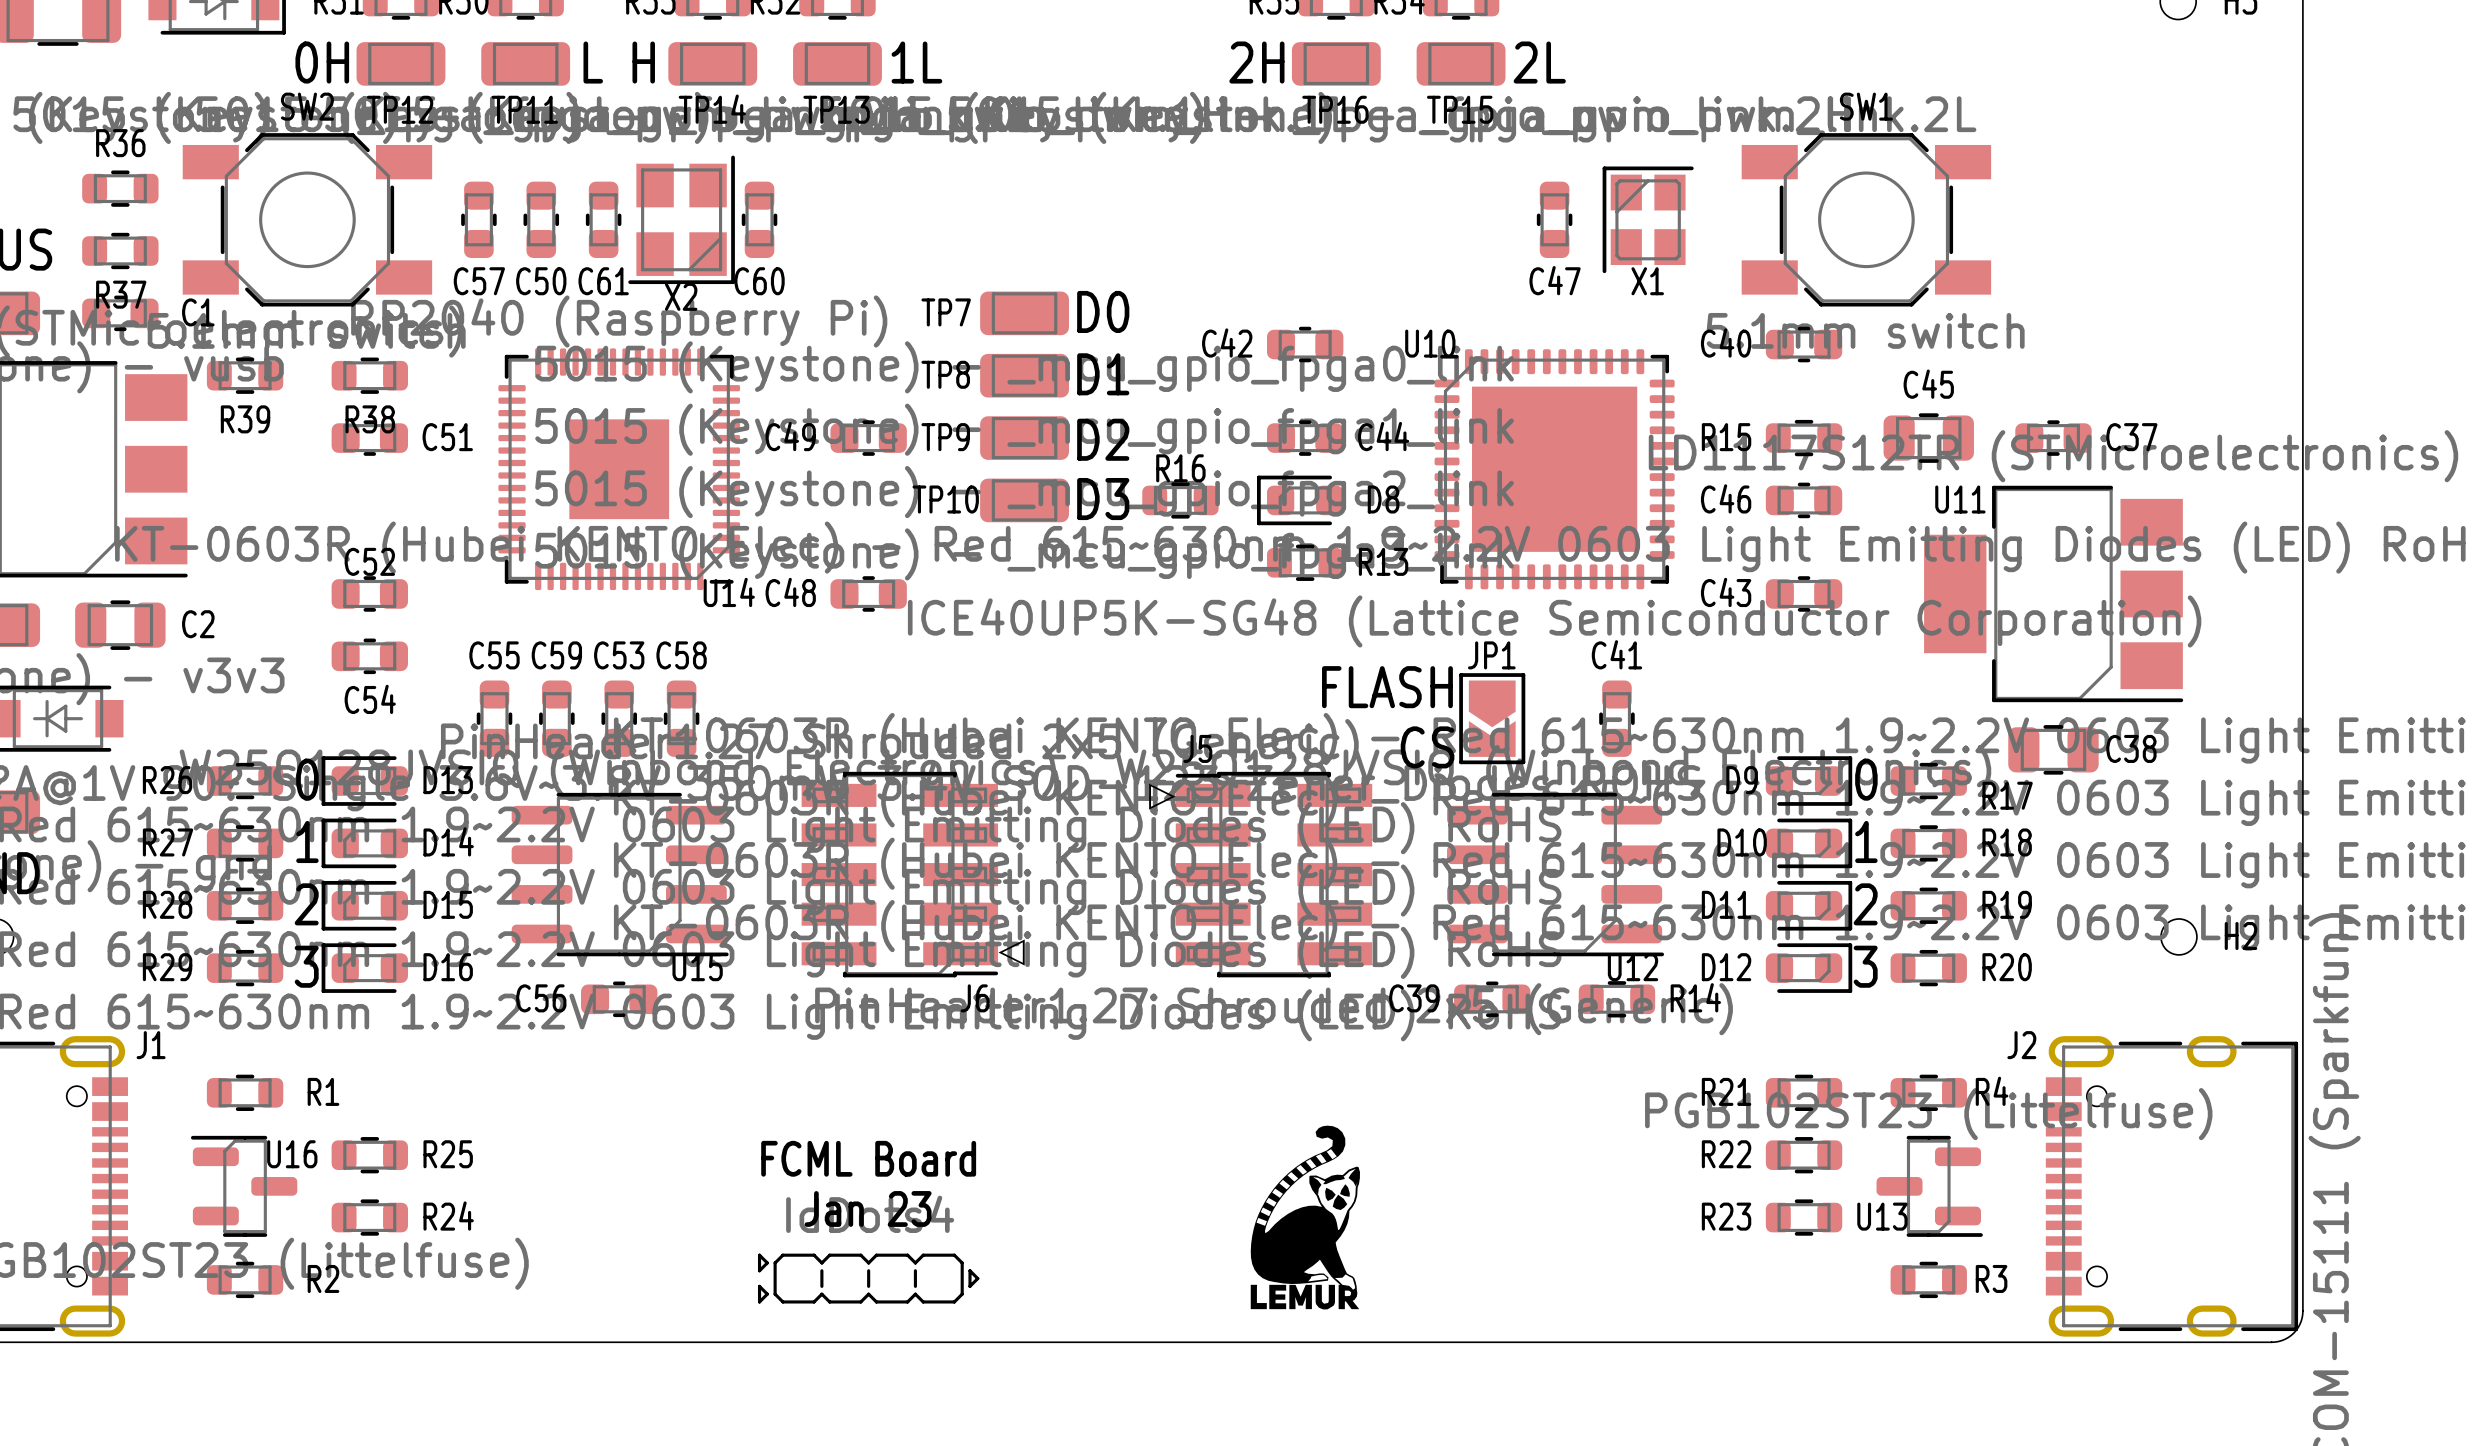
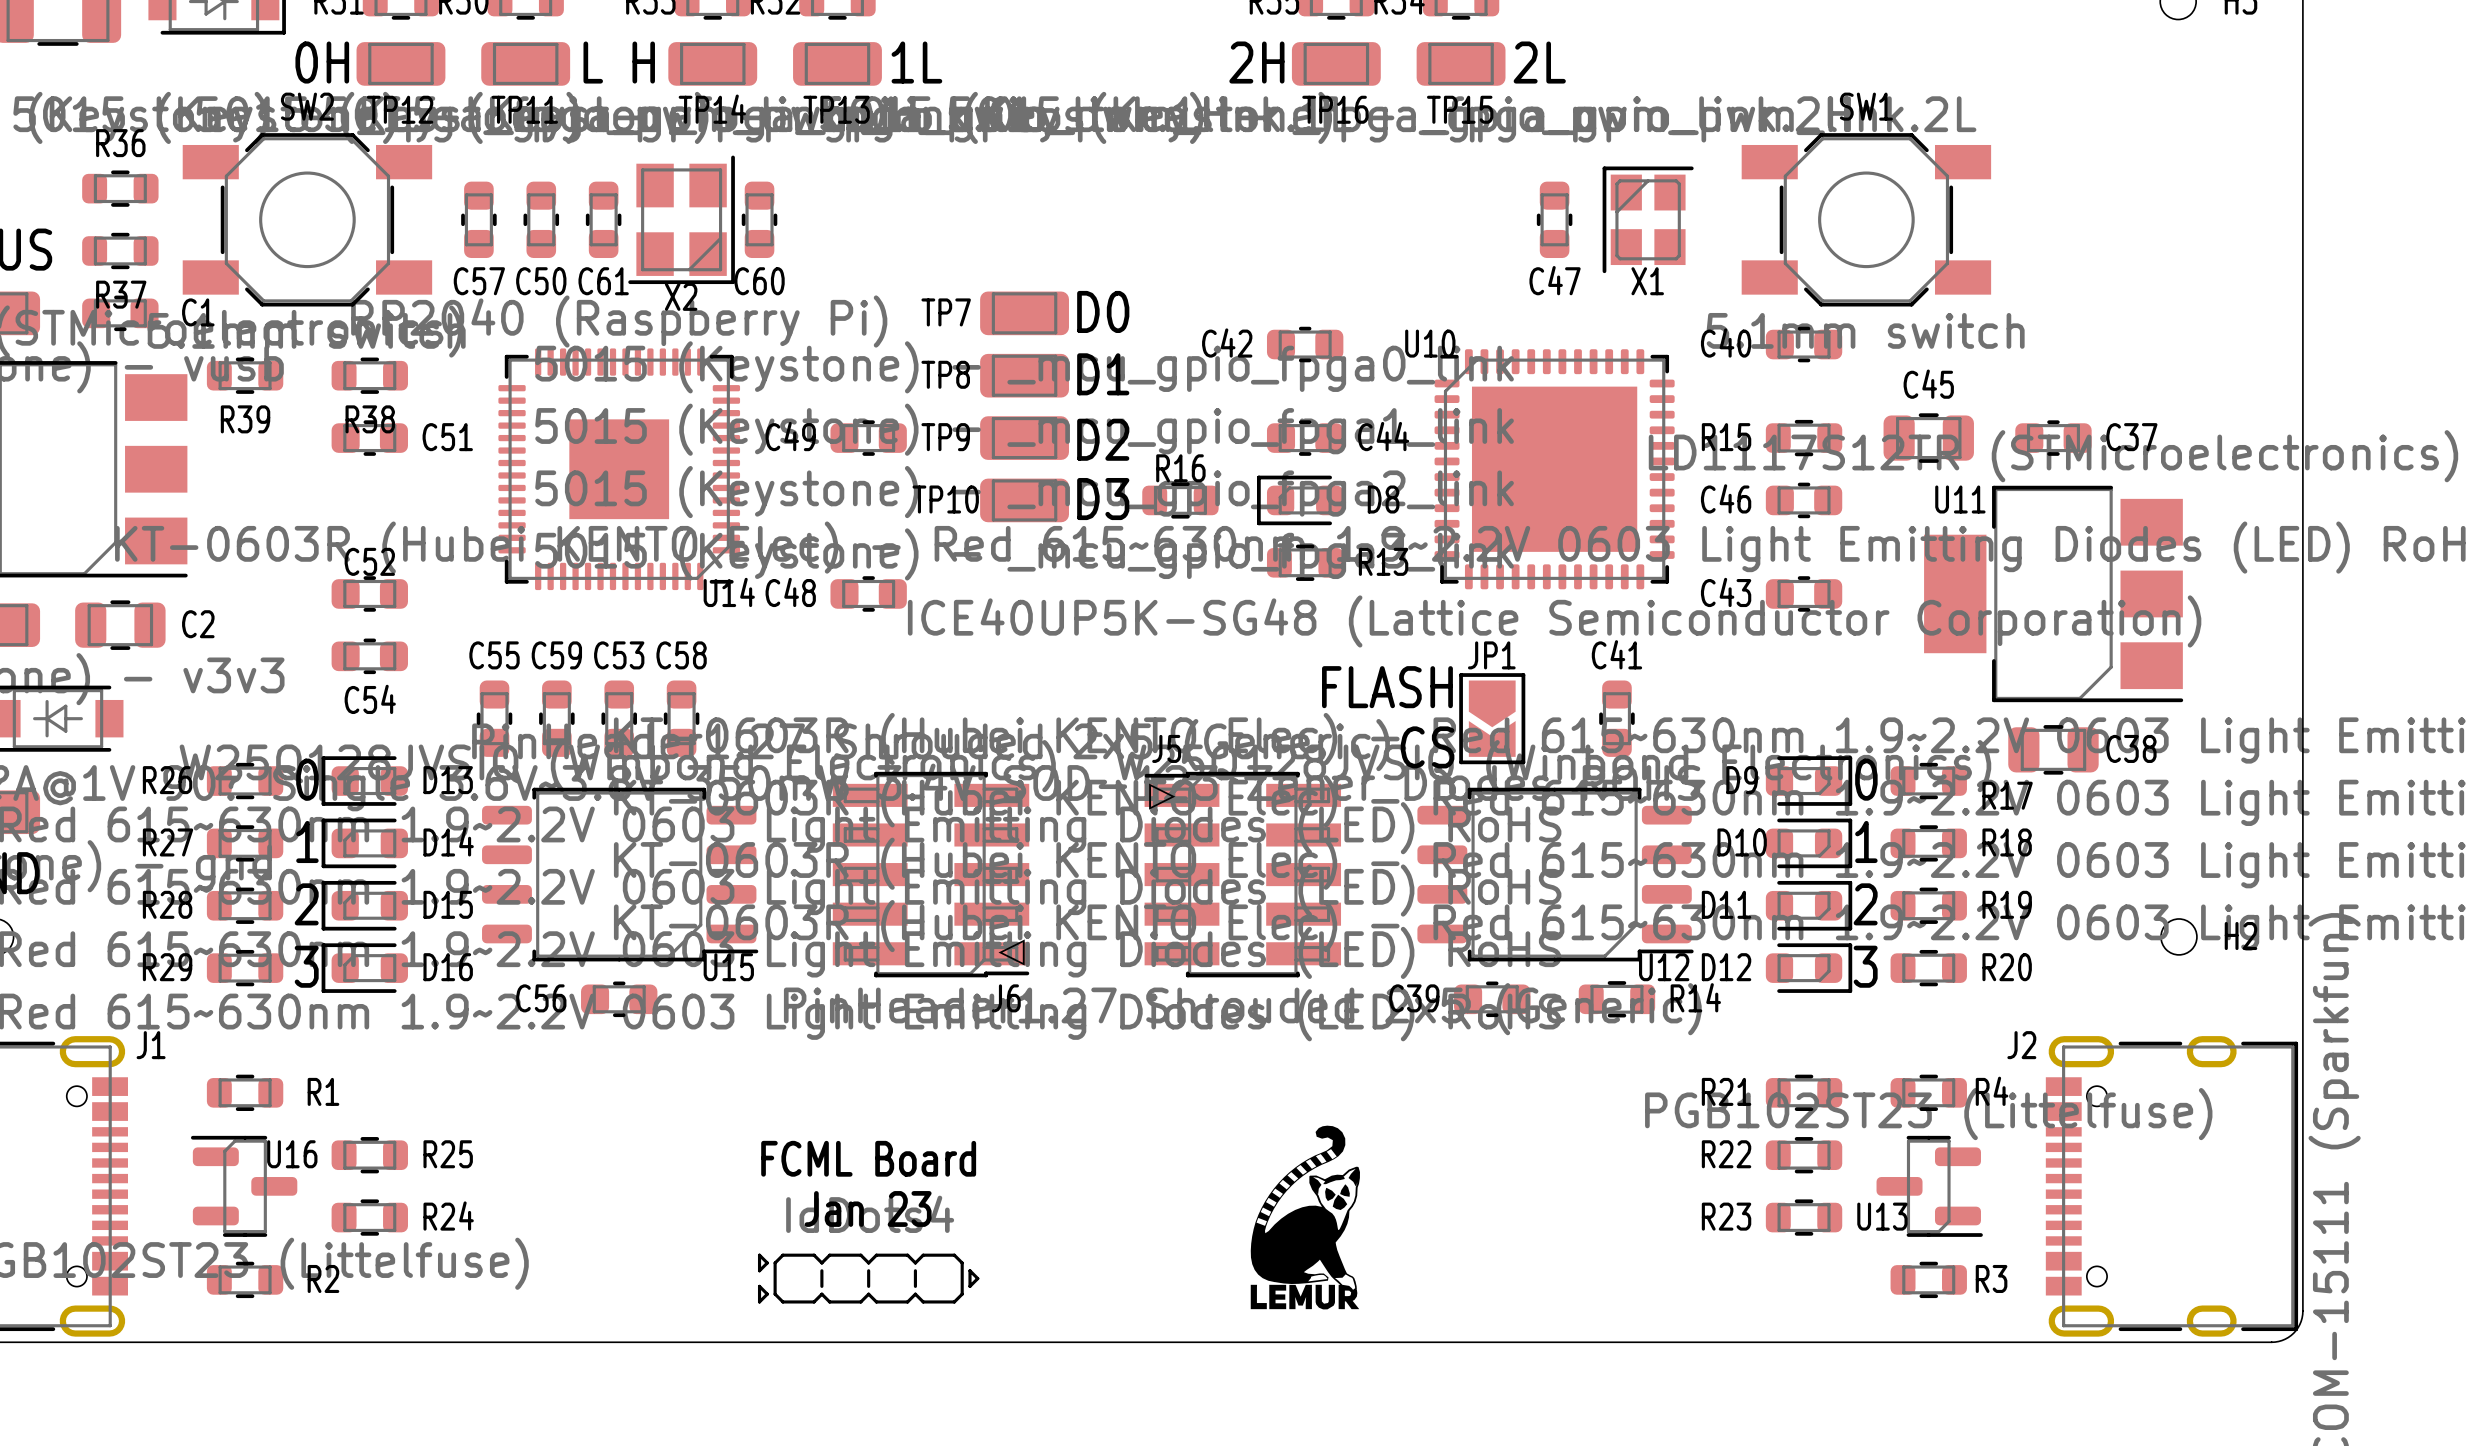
U15 footprint: [511, 792, 729, 957] -> [482, 787, 759, 962]
U12 footprint: [1447, 792, 1665, 957] -> [1417, 787, 1694, 962]
J6 position: (899, 874) -> (931, 874)
J5 position: (1273, 874) -> (1242, 874)

